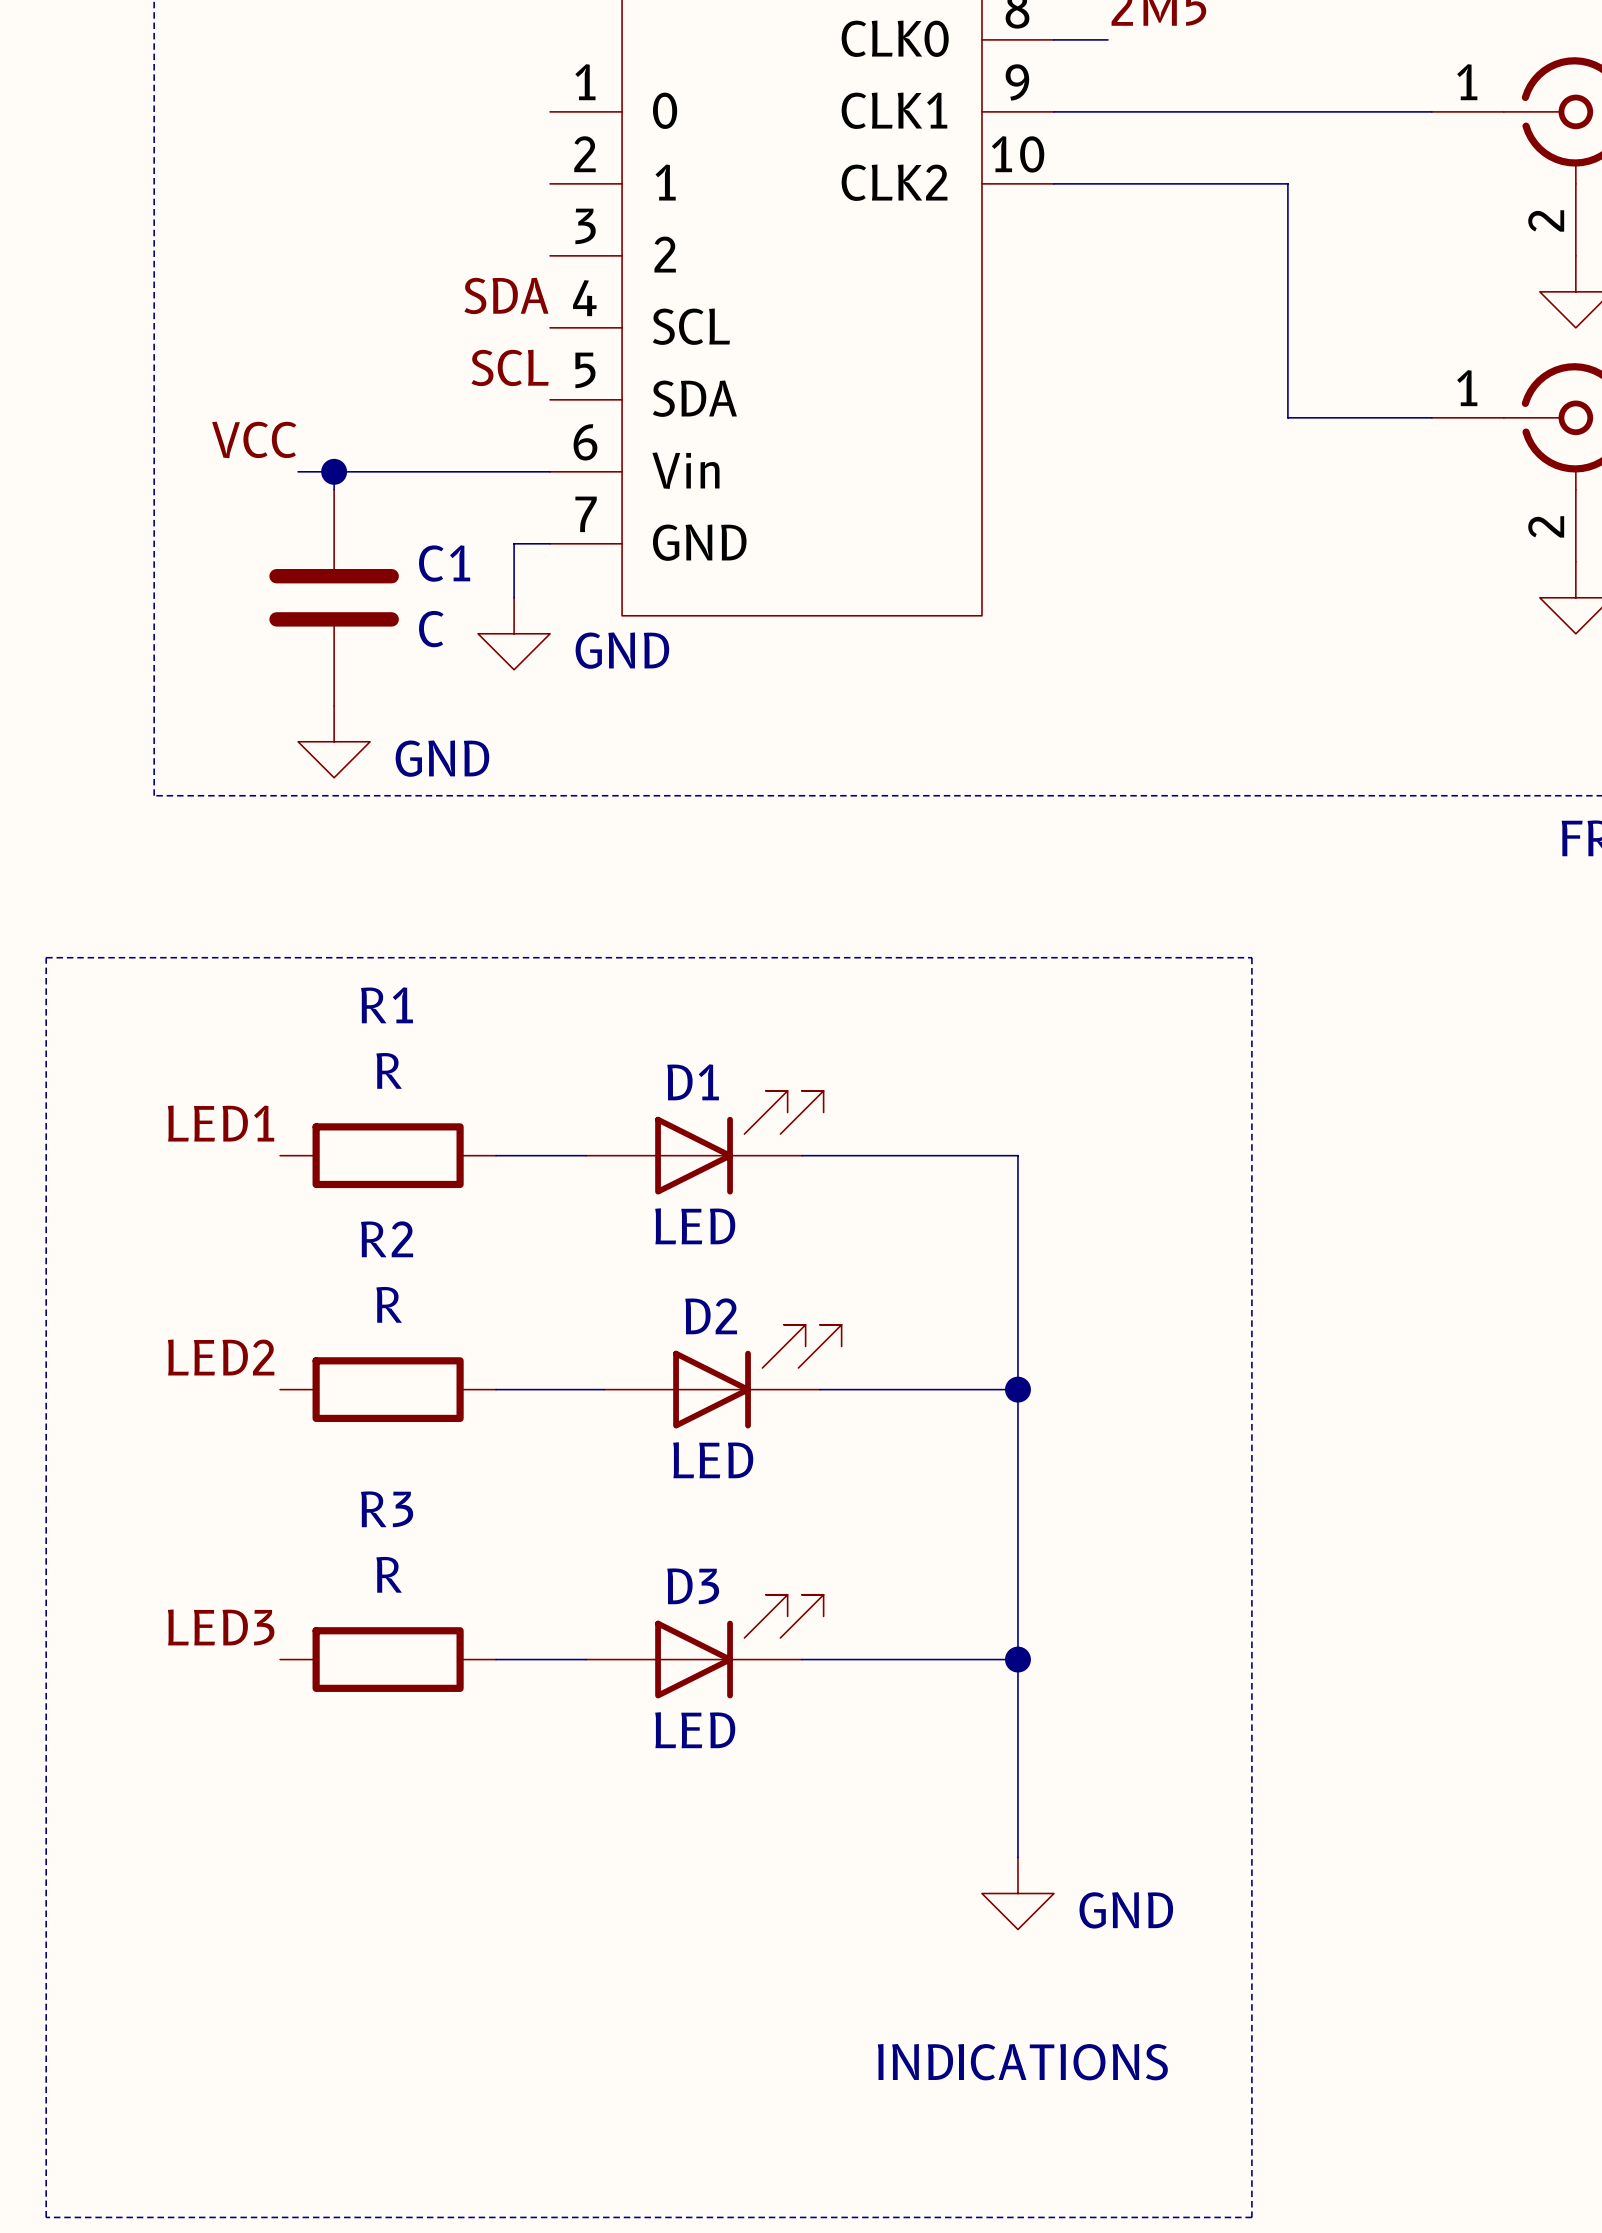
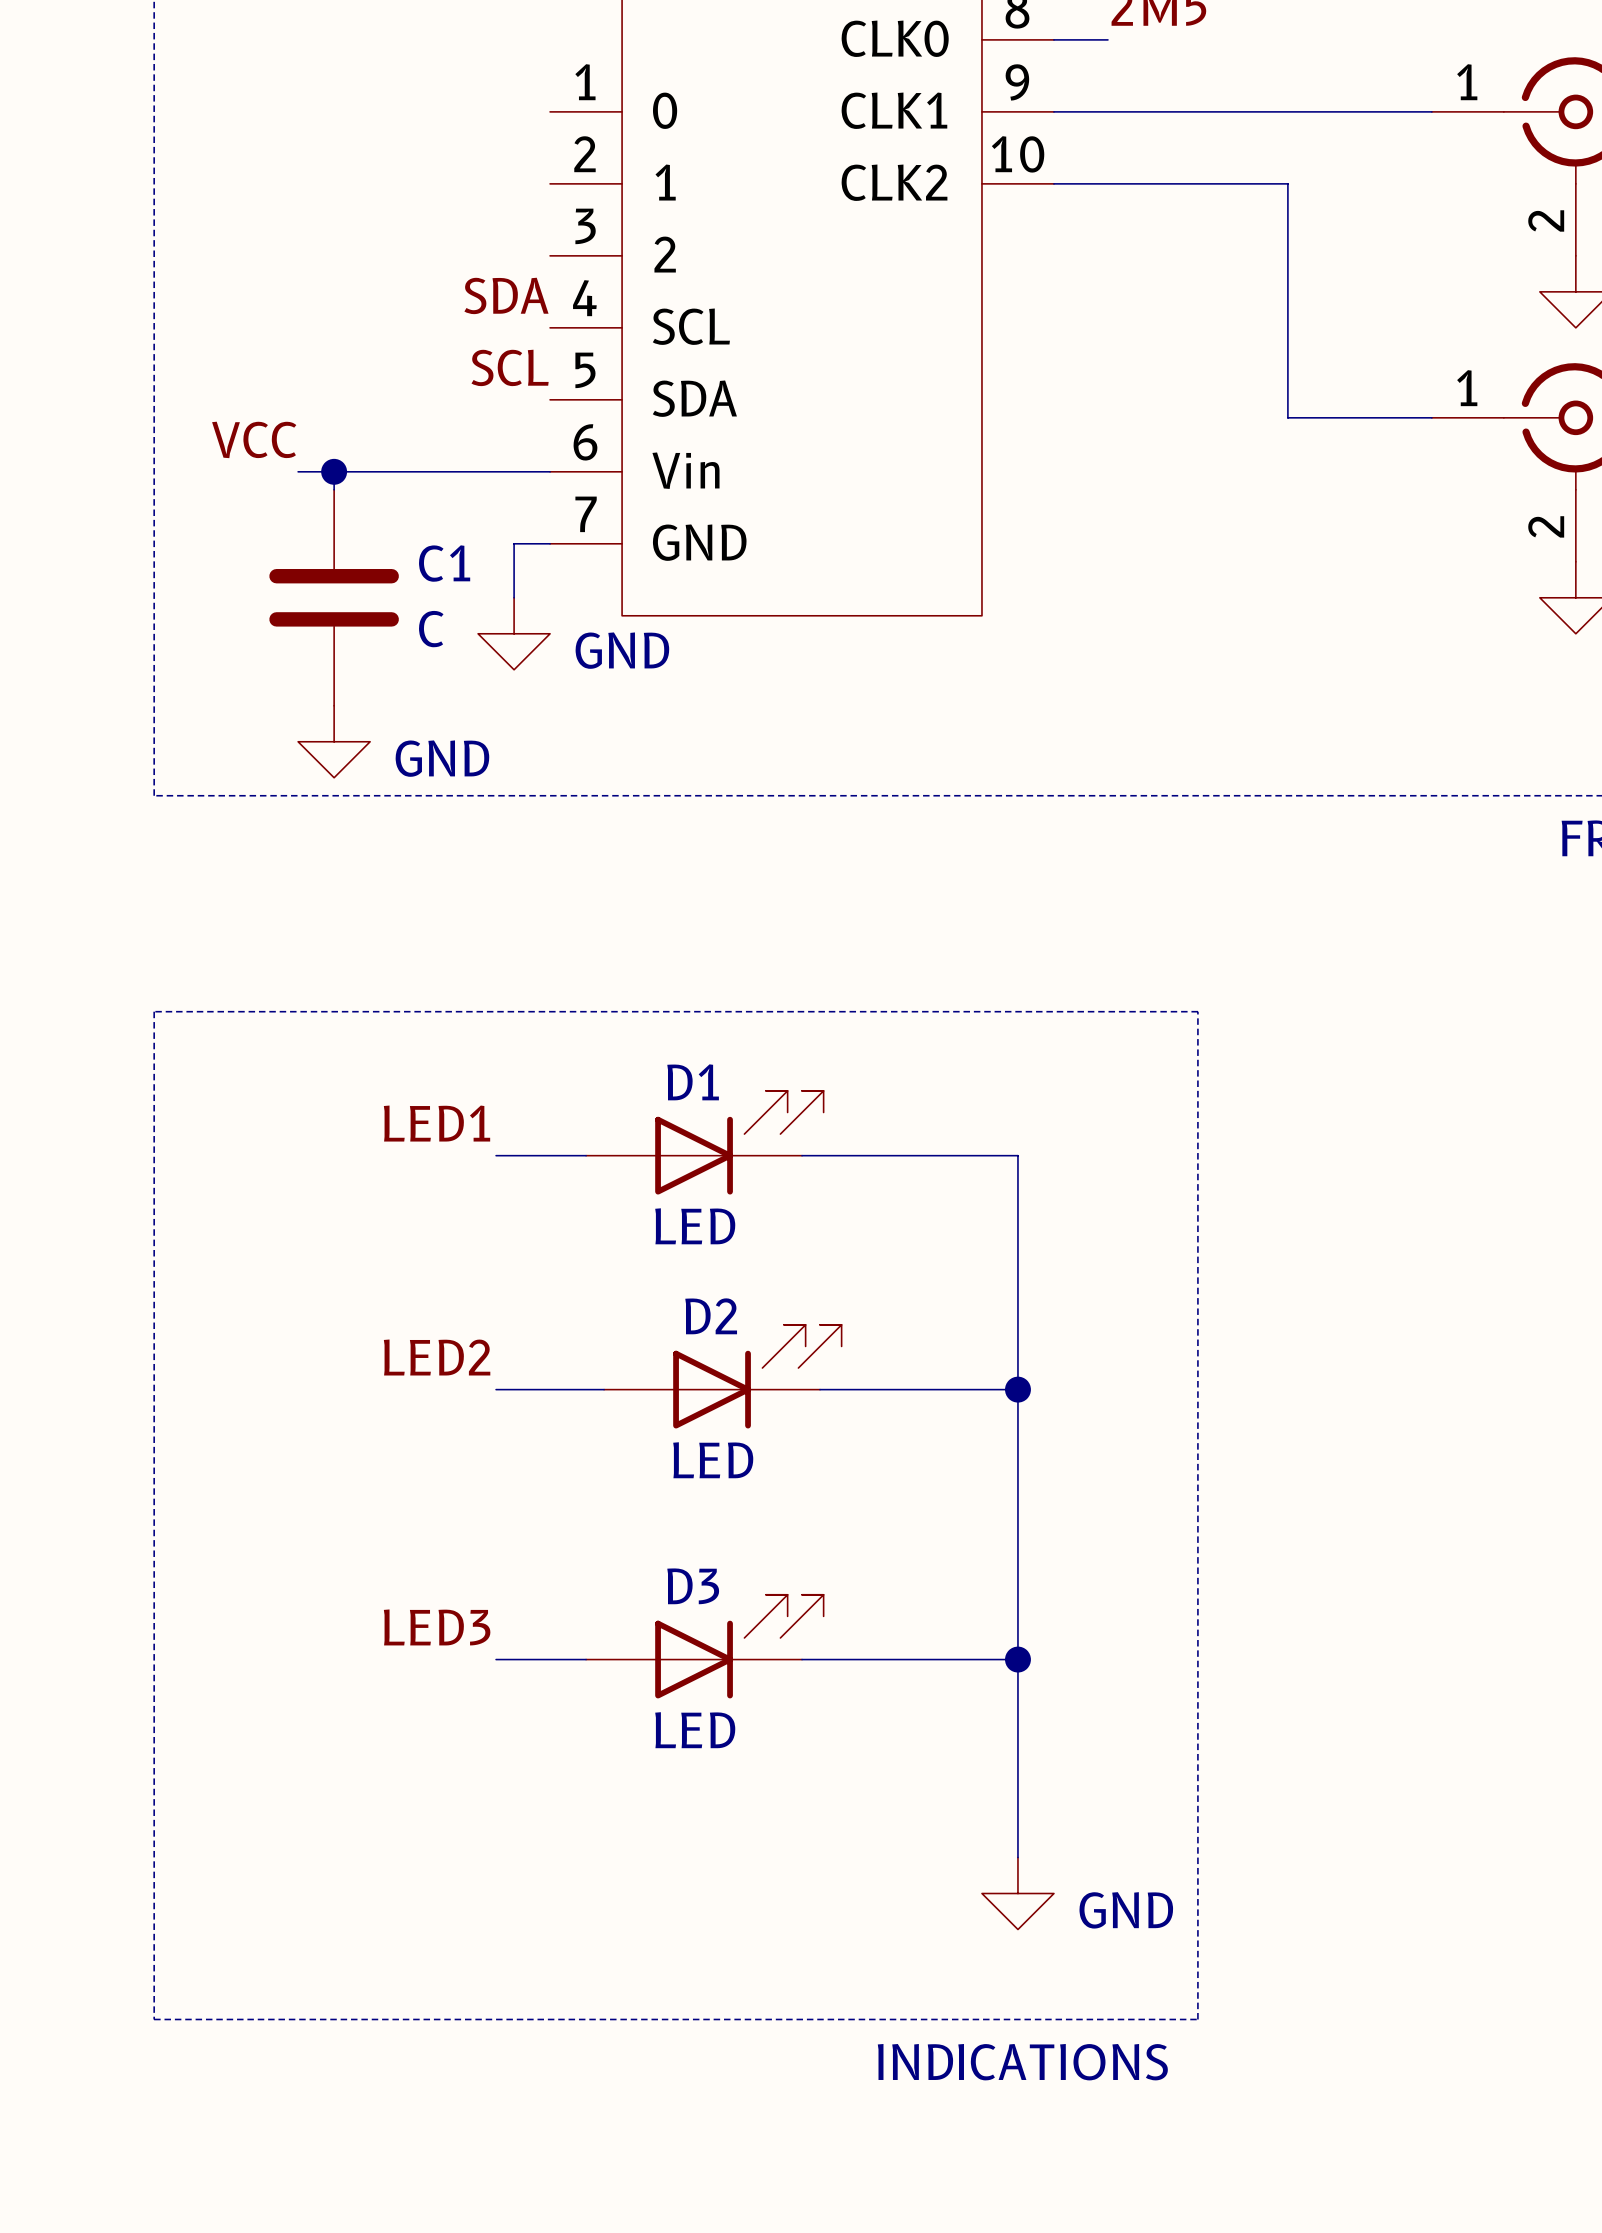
line: (46, 957) (1251, 957) (1251, 2217) (46, 2217) (46, 957) -> (154, 1011) (154, 2019) (1197, 2019) (1197, 1011) (154, 1011)
label position: LED1 (221, 1123) -> LED1 (437, 1123)
R1: R (388, 1155) -> none
label position: LED2 (221, 1357) -> LED2 (437, 1357)
R2: R (388, 1389) -> none
label position: LED3 (221, 1627) -> LED3 (437, 1627)
R3: R (388, 1659) -> none

